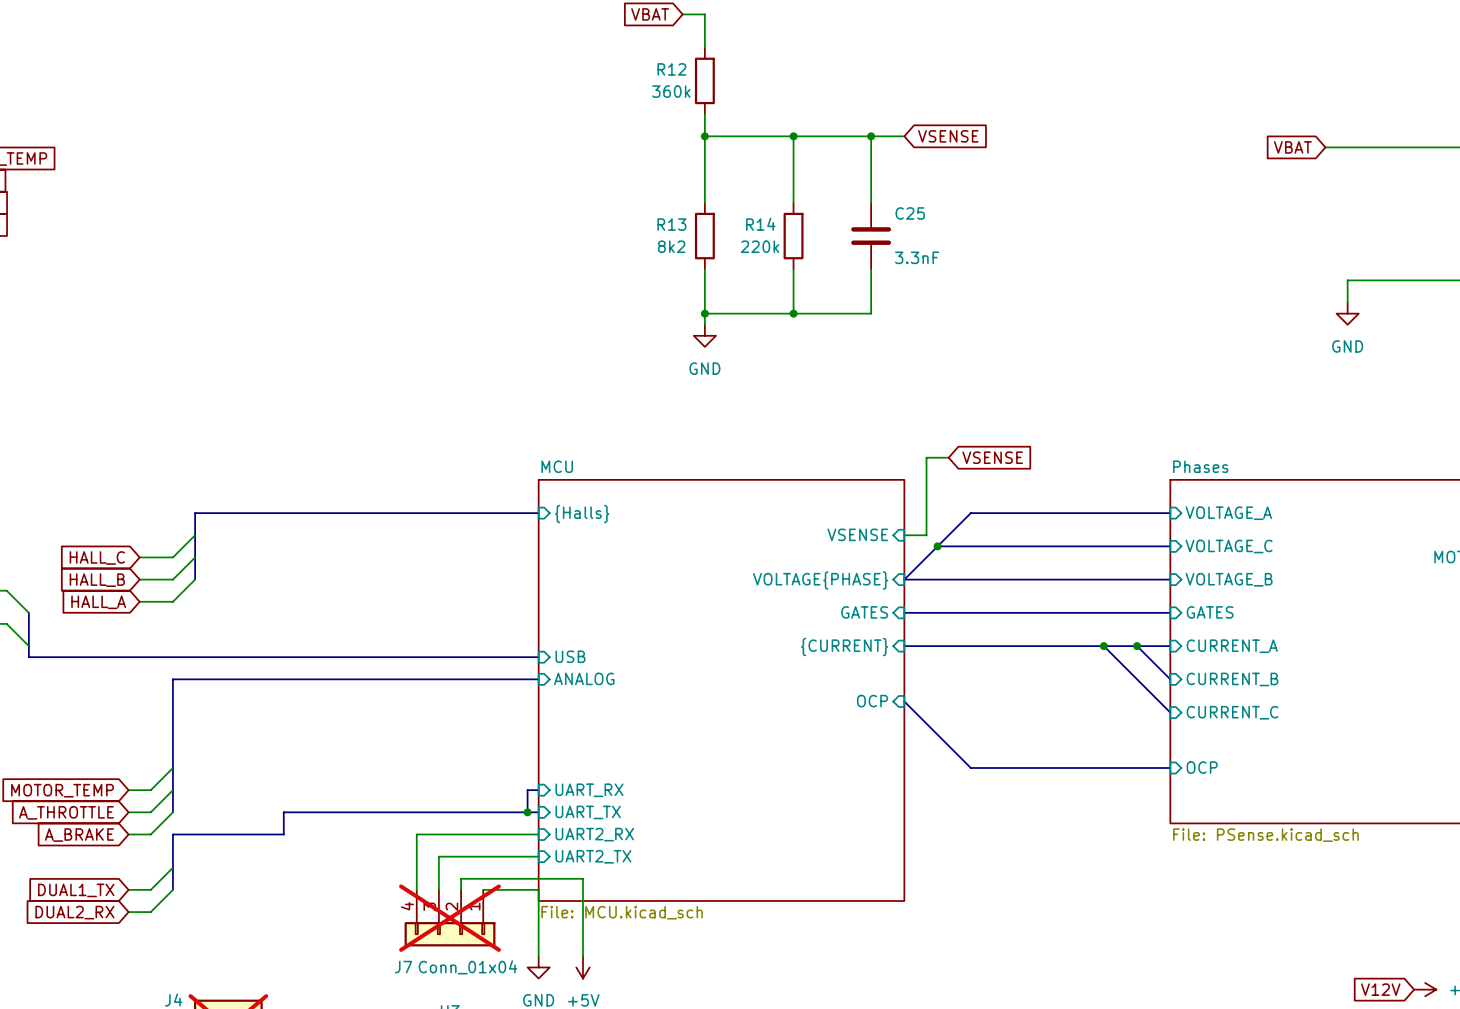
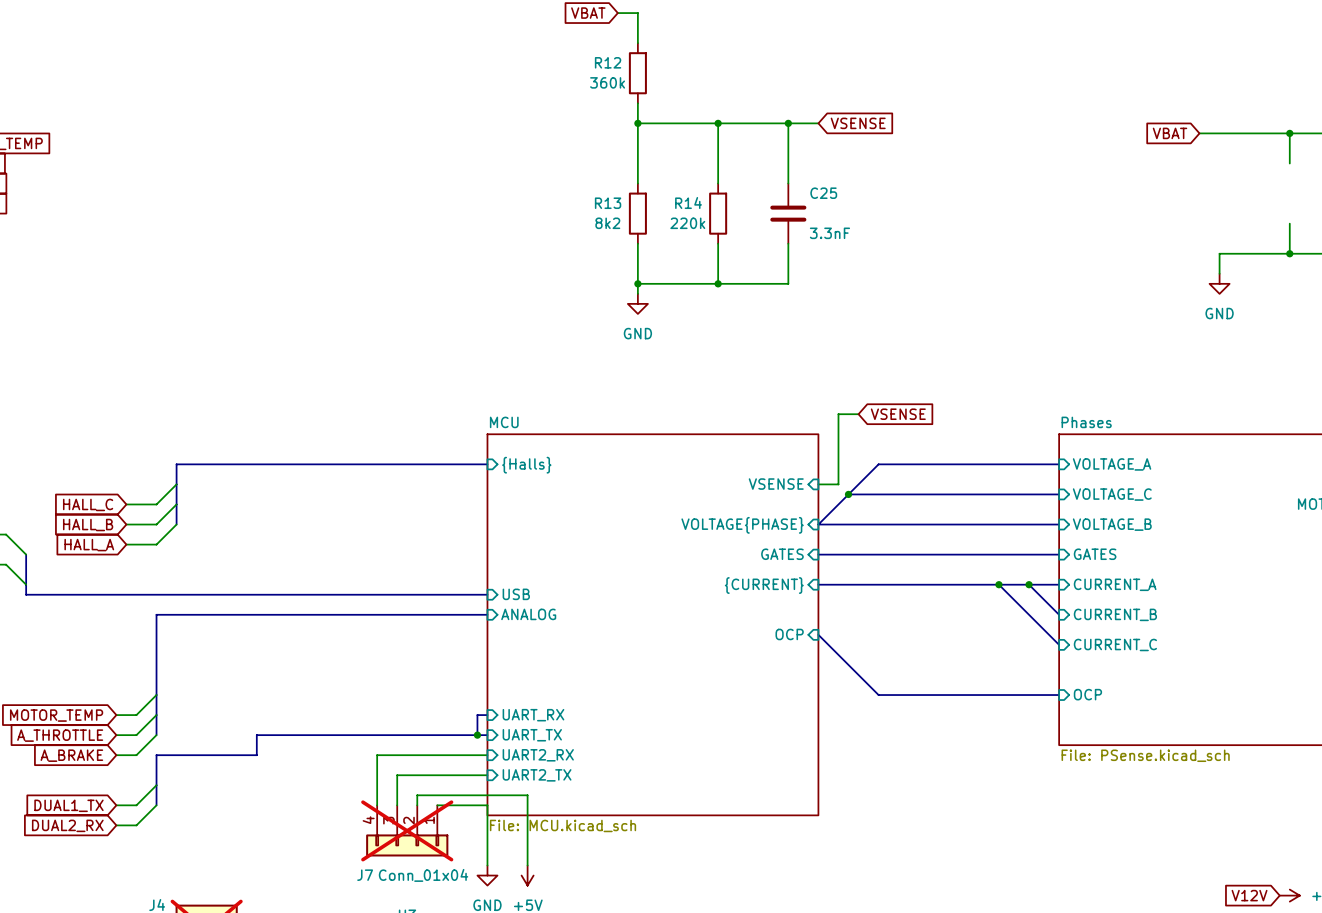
wire: none -> (1289, 133) (1289, 163)
junction: none -> (1289, 133)
wire: none -> (1289, 223) (1289, 253)
junction: none -> (1289, 253)

